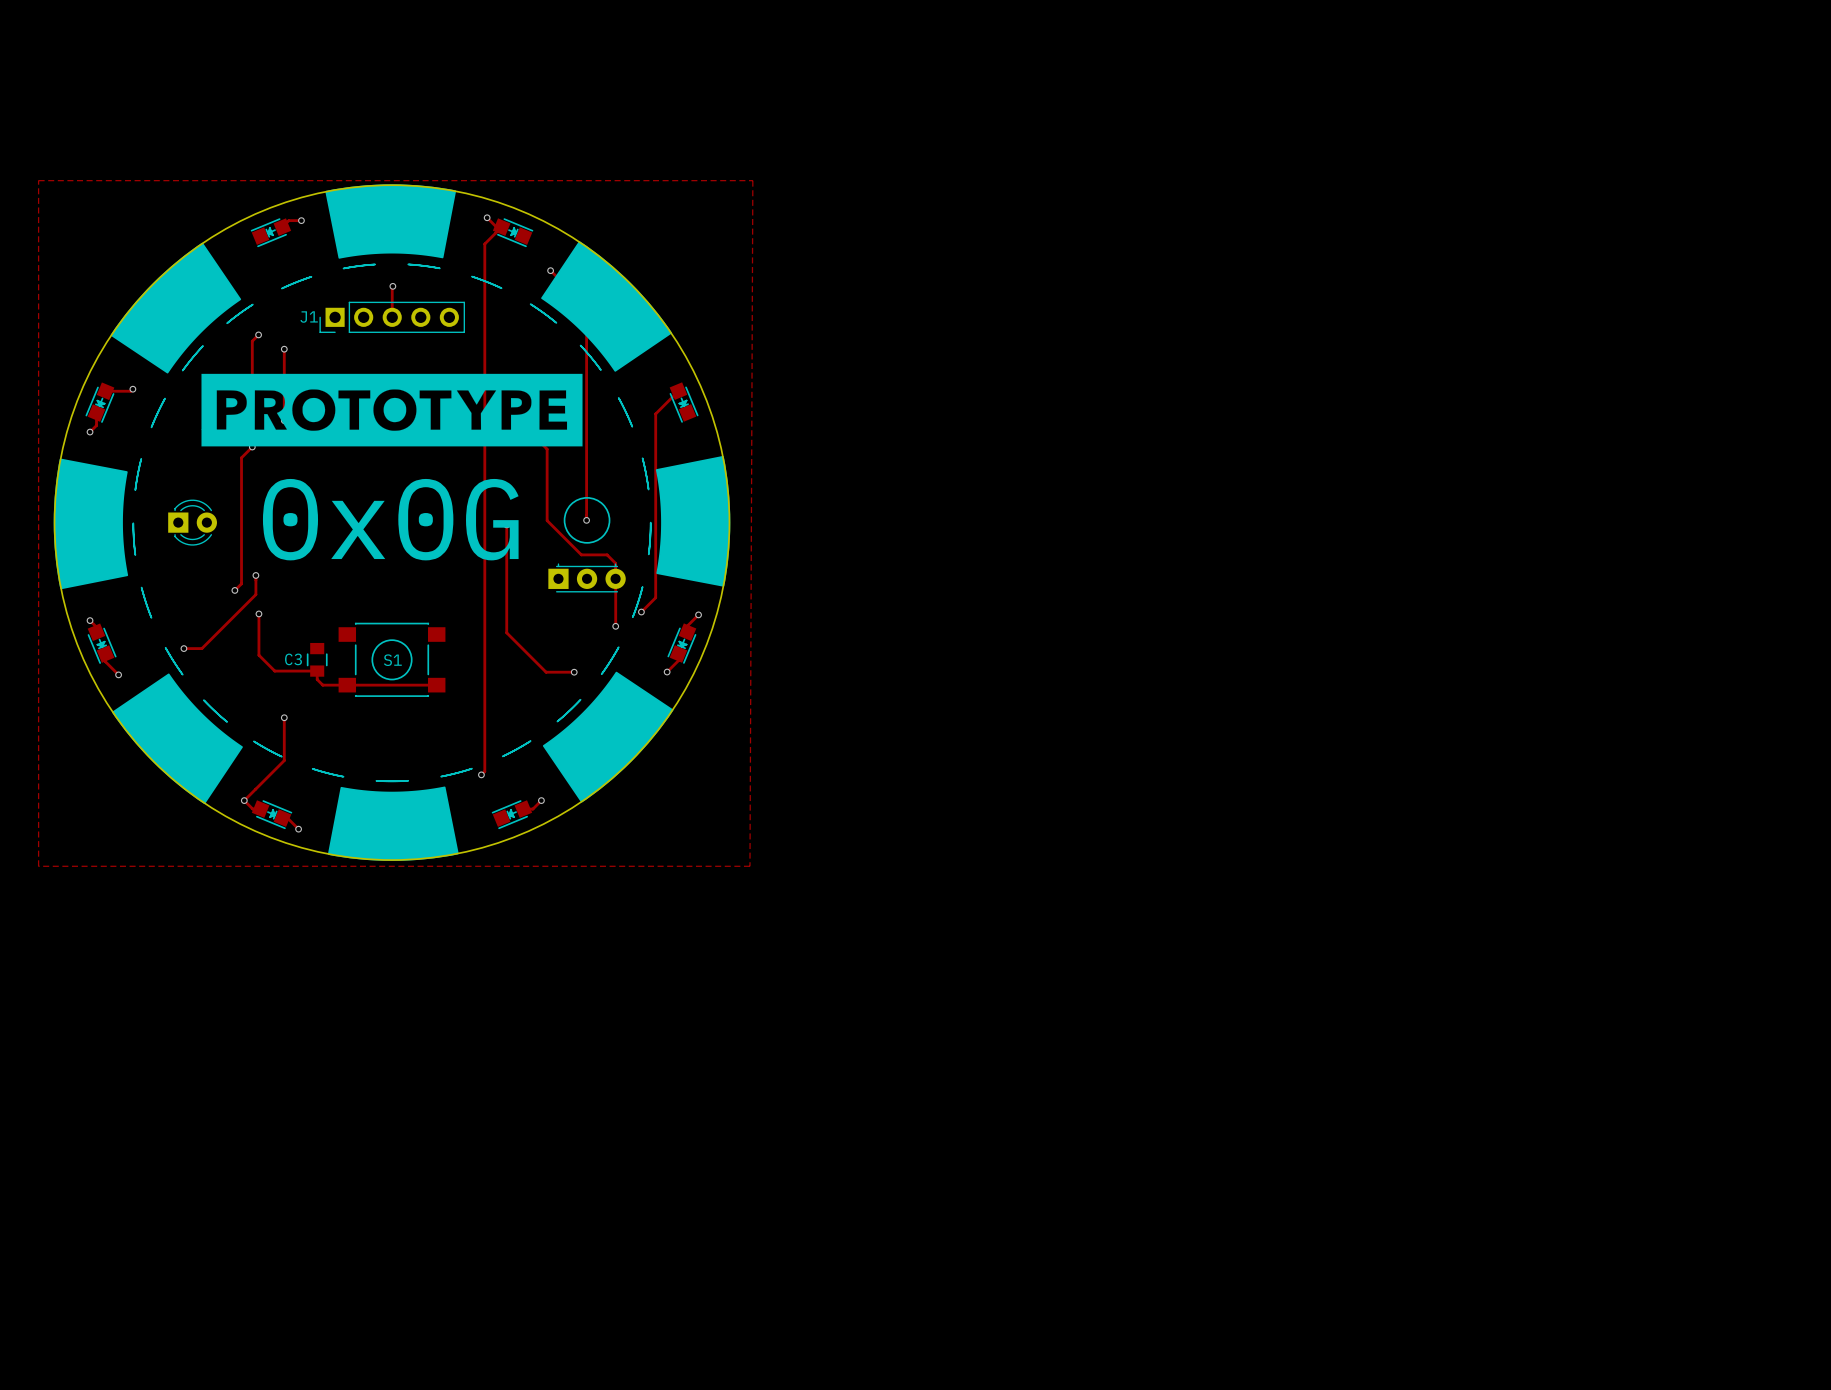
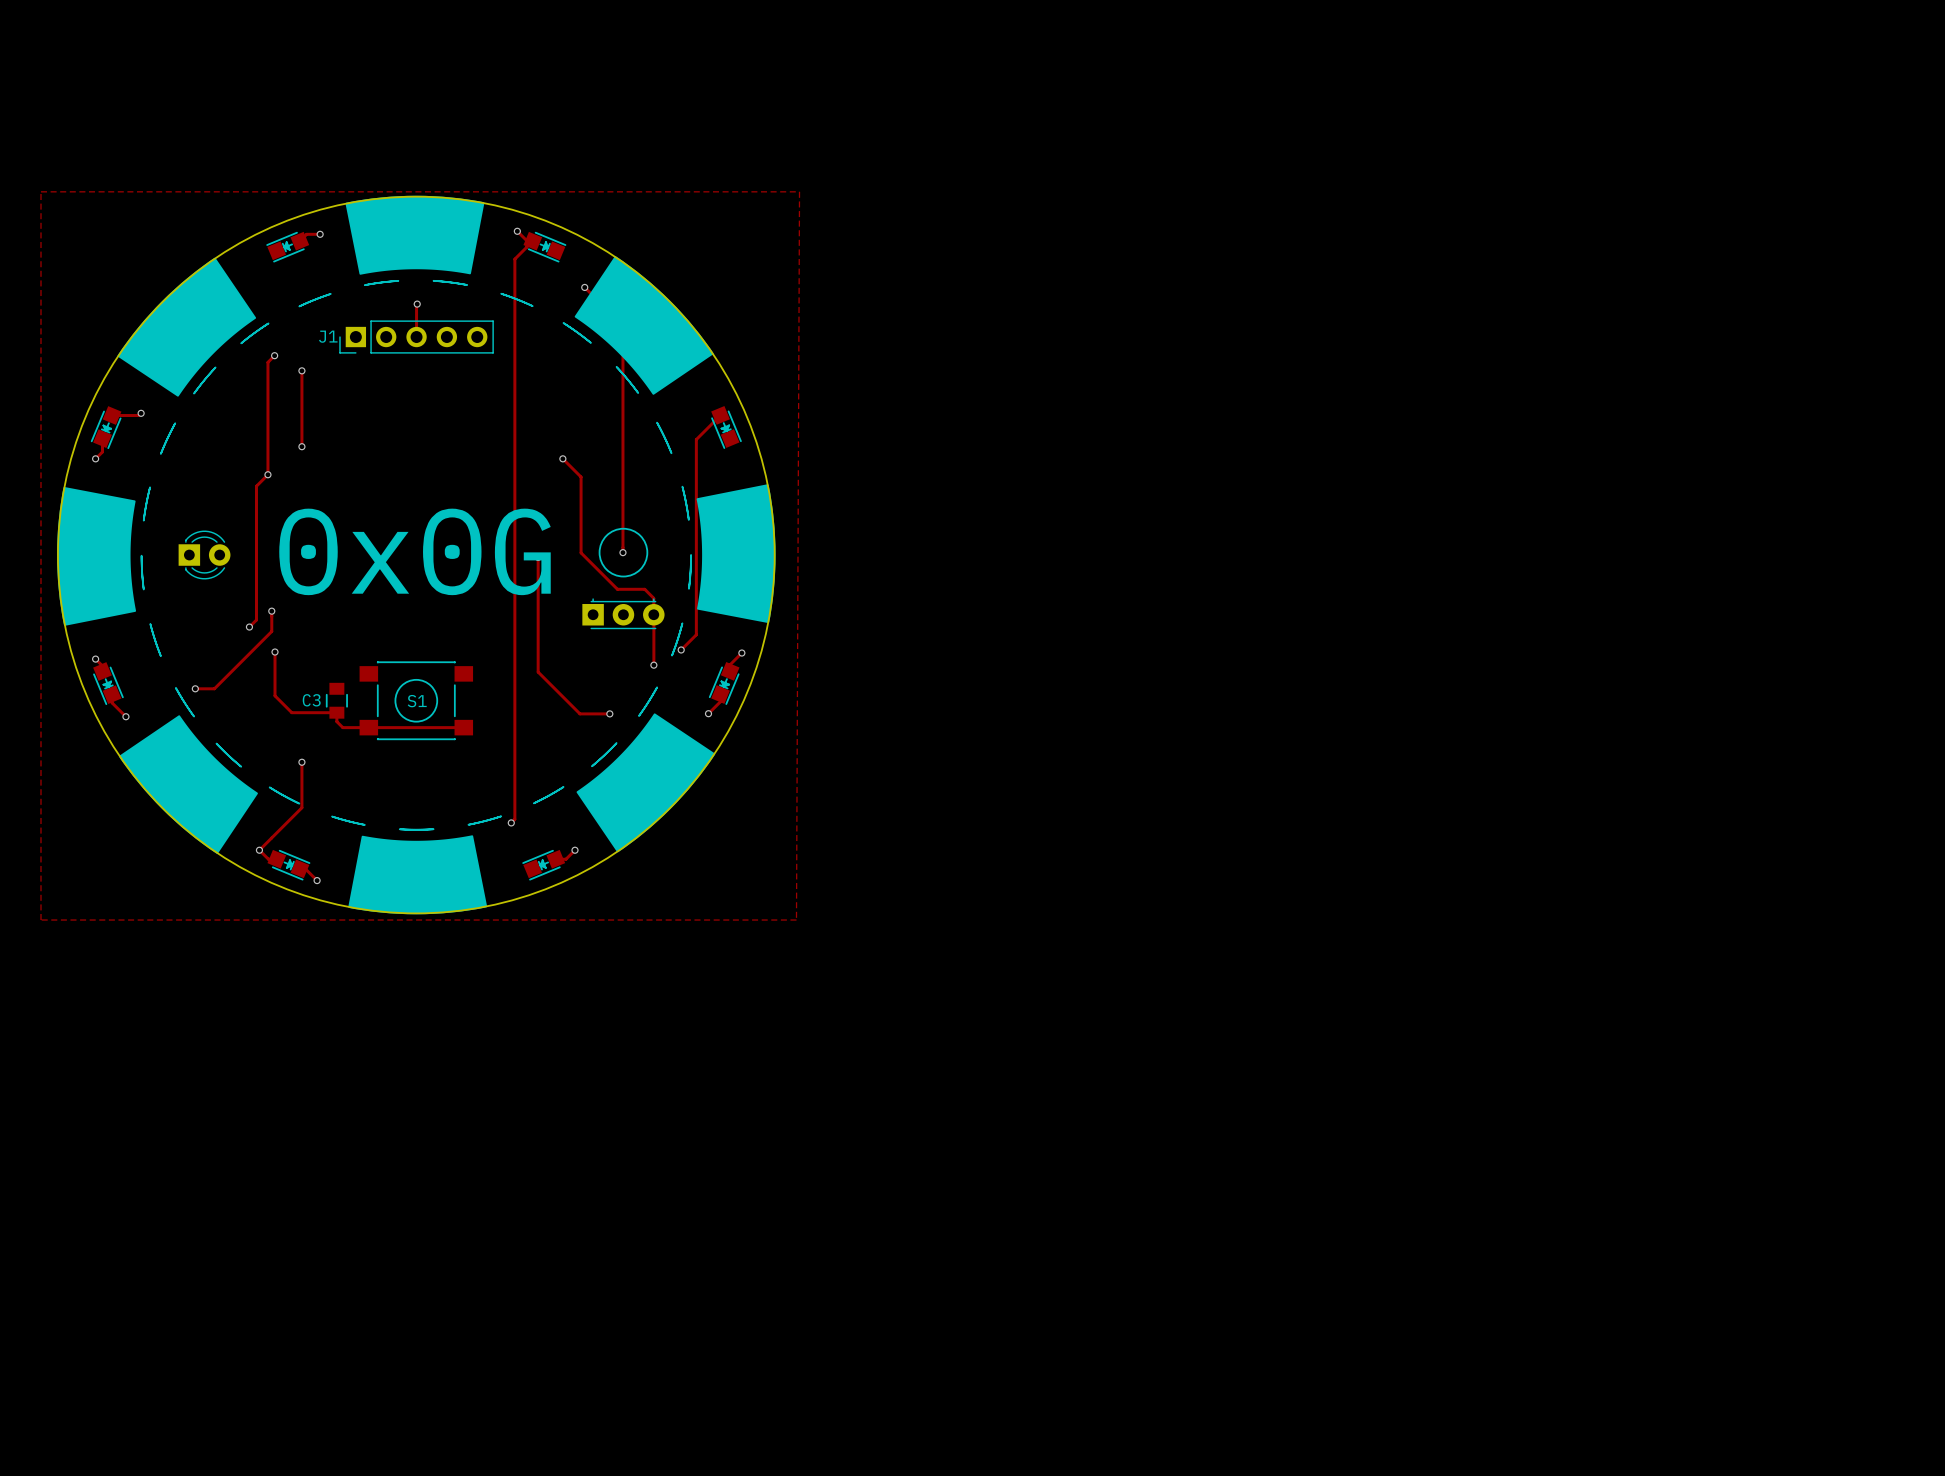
drawing: [201, 373, 583, 447] -> none

